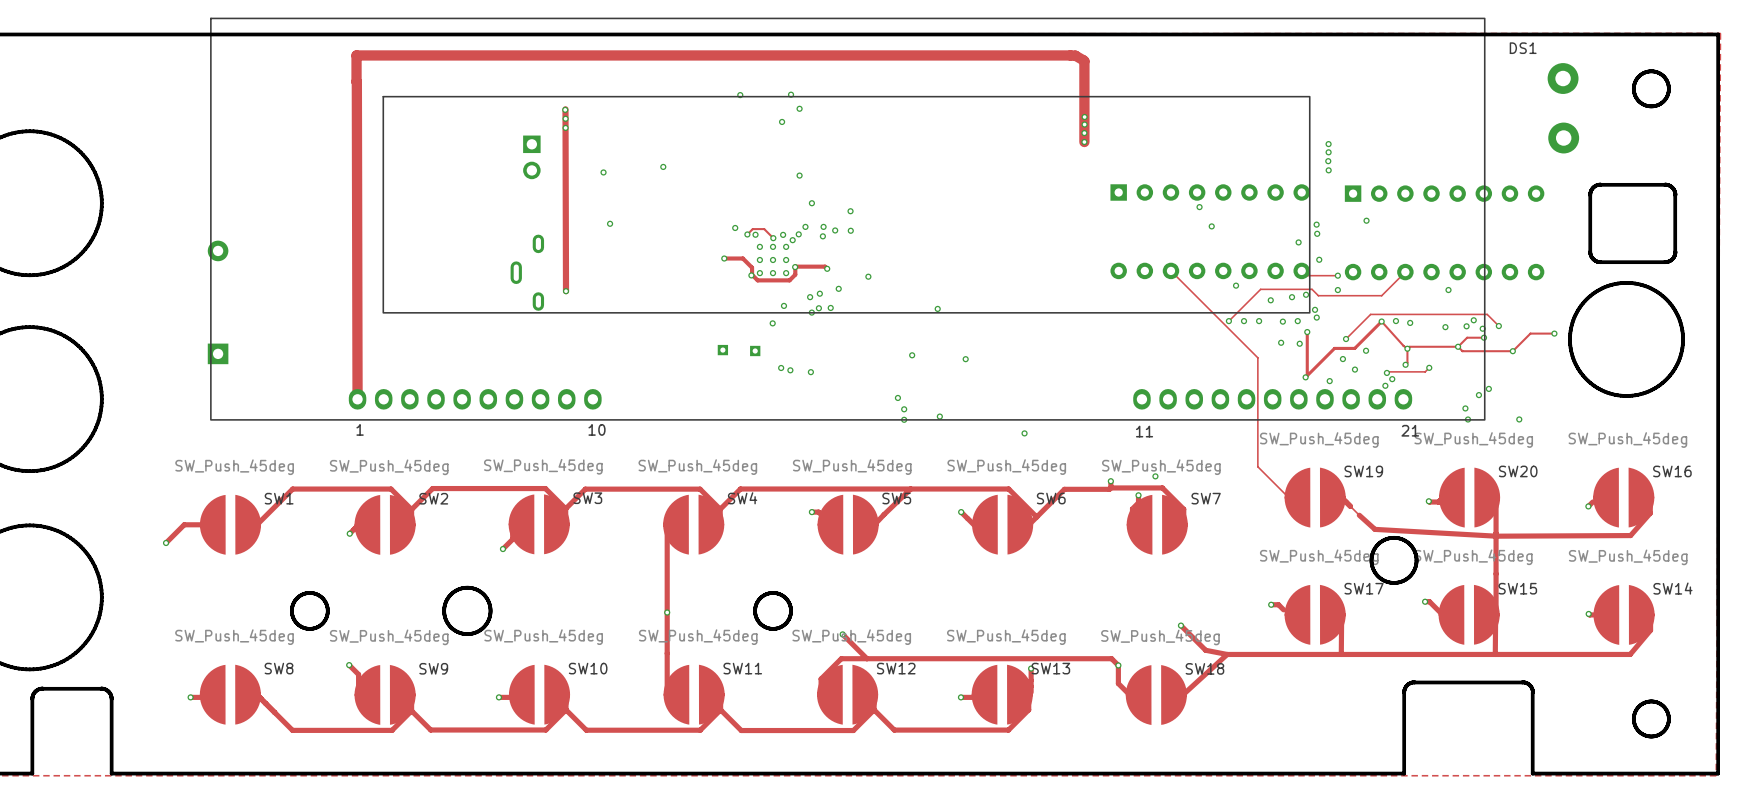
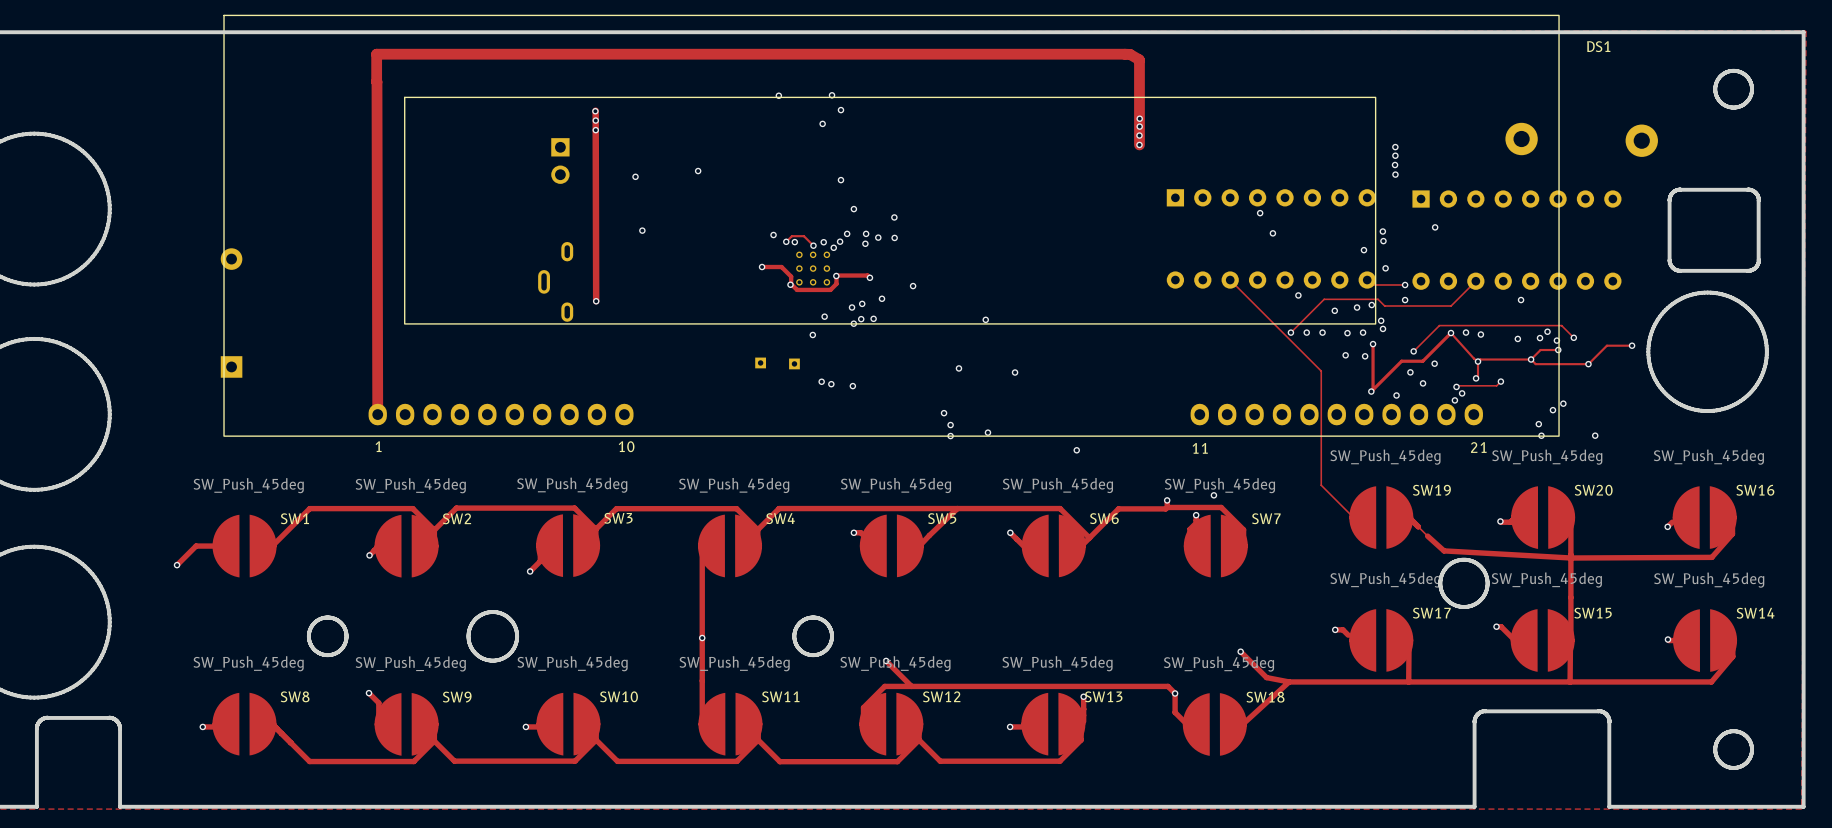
part position: (1563, 78) -> (1521, 139)

